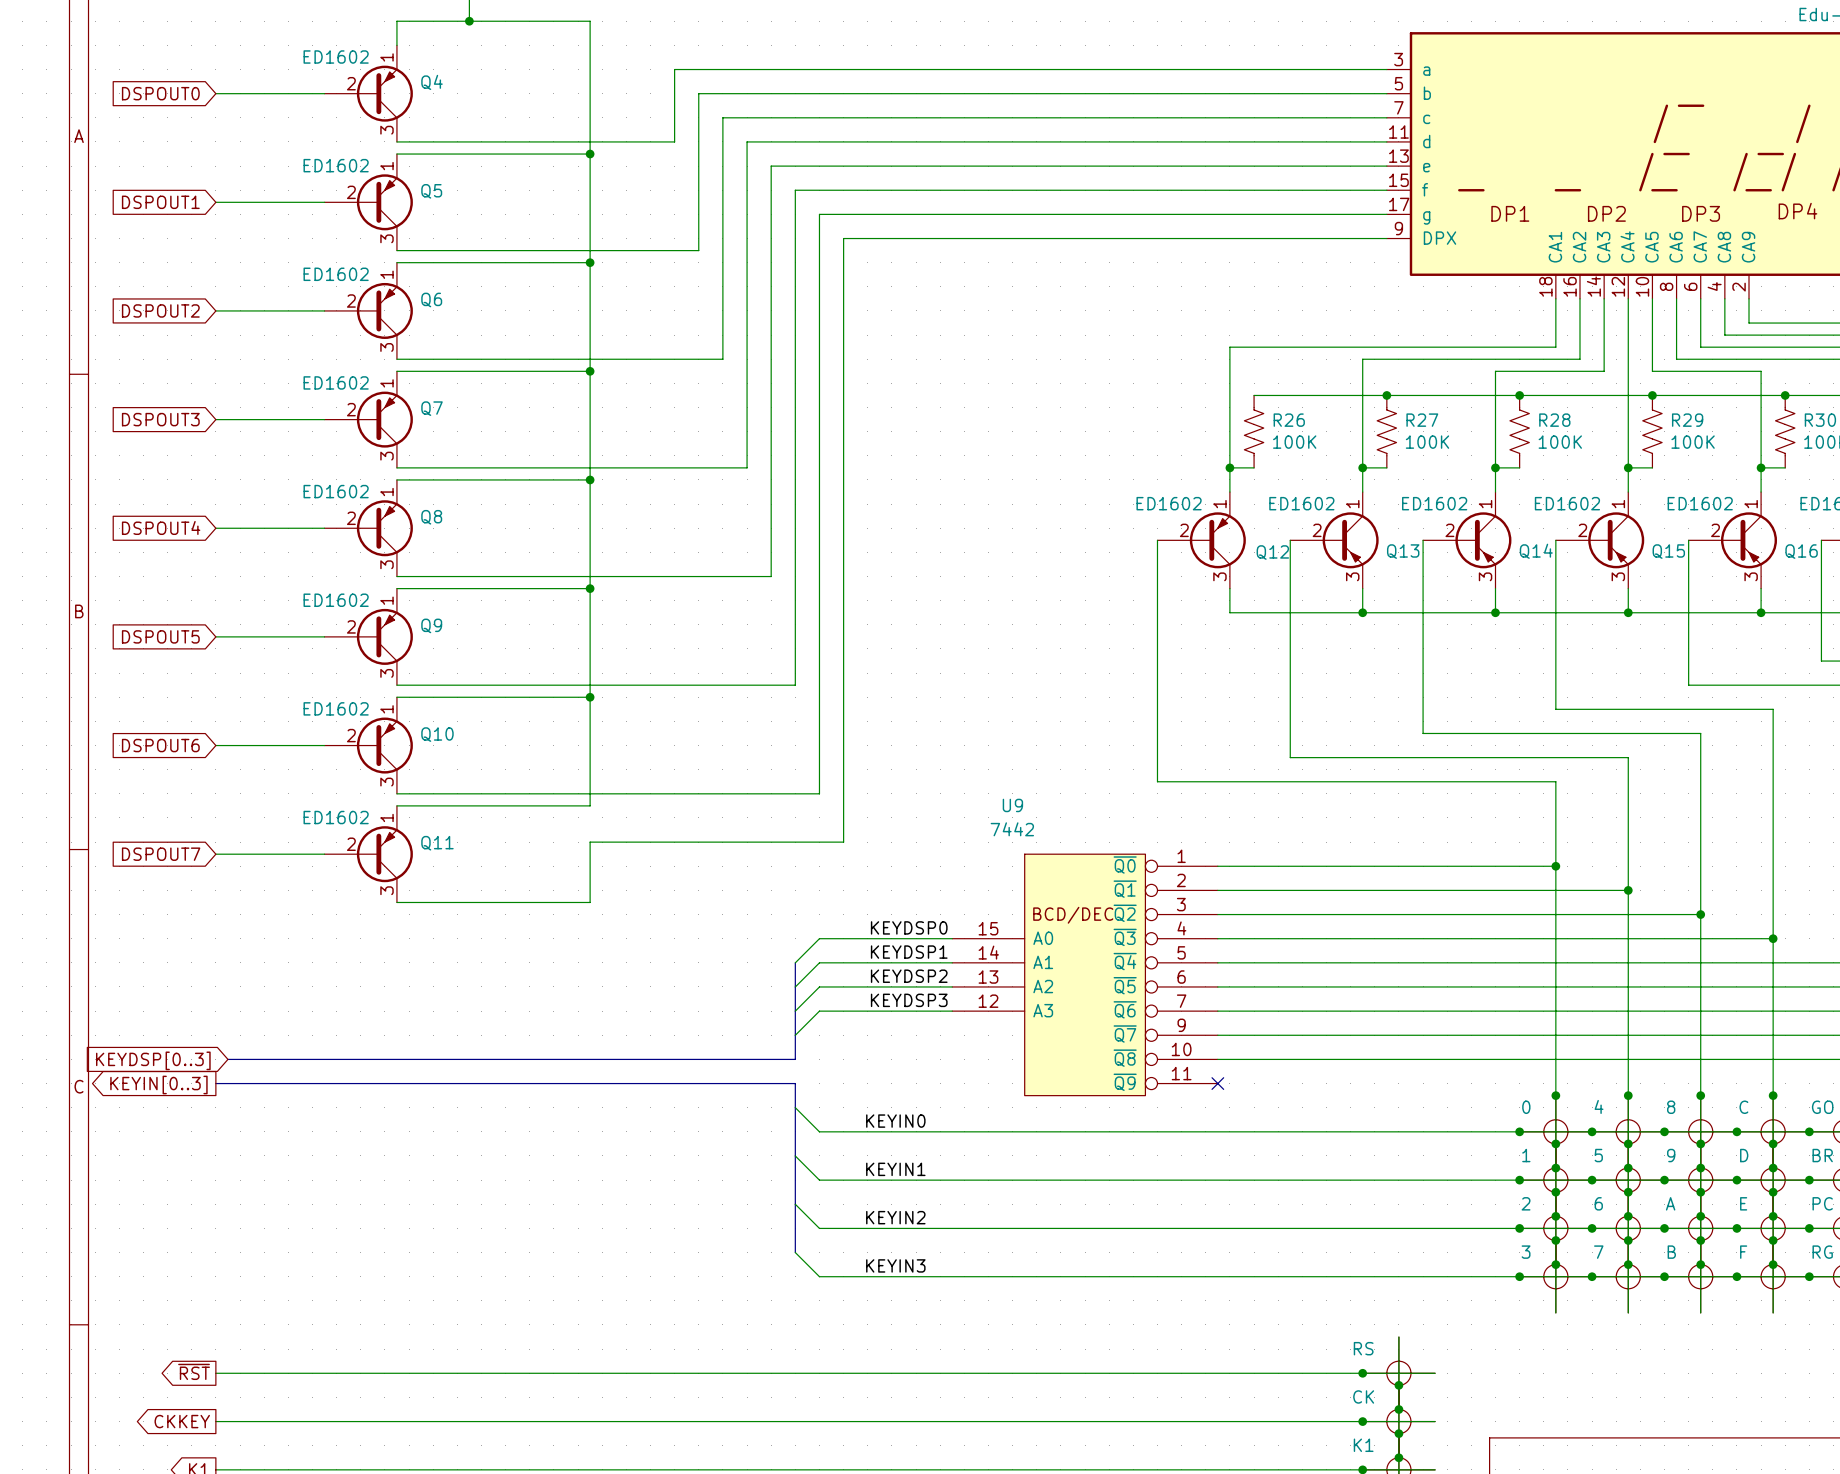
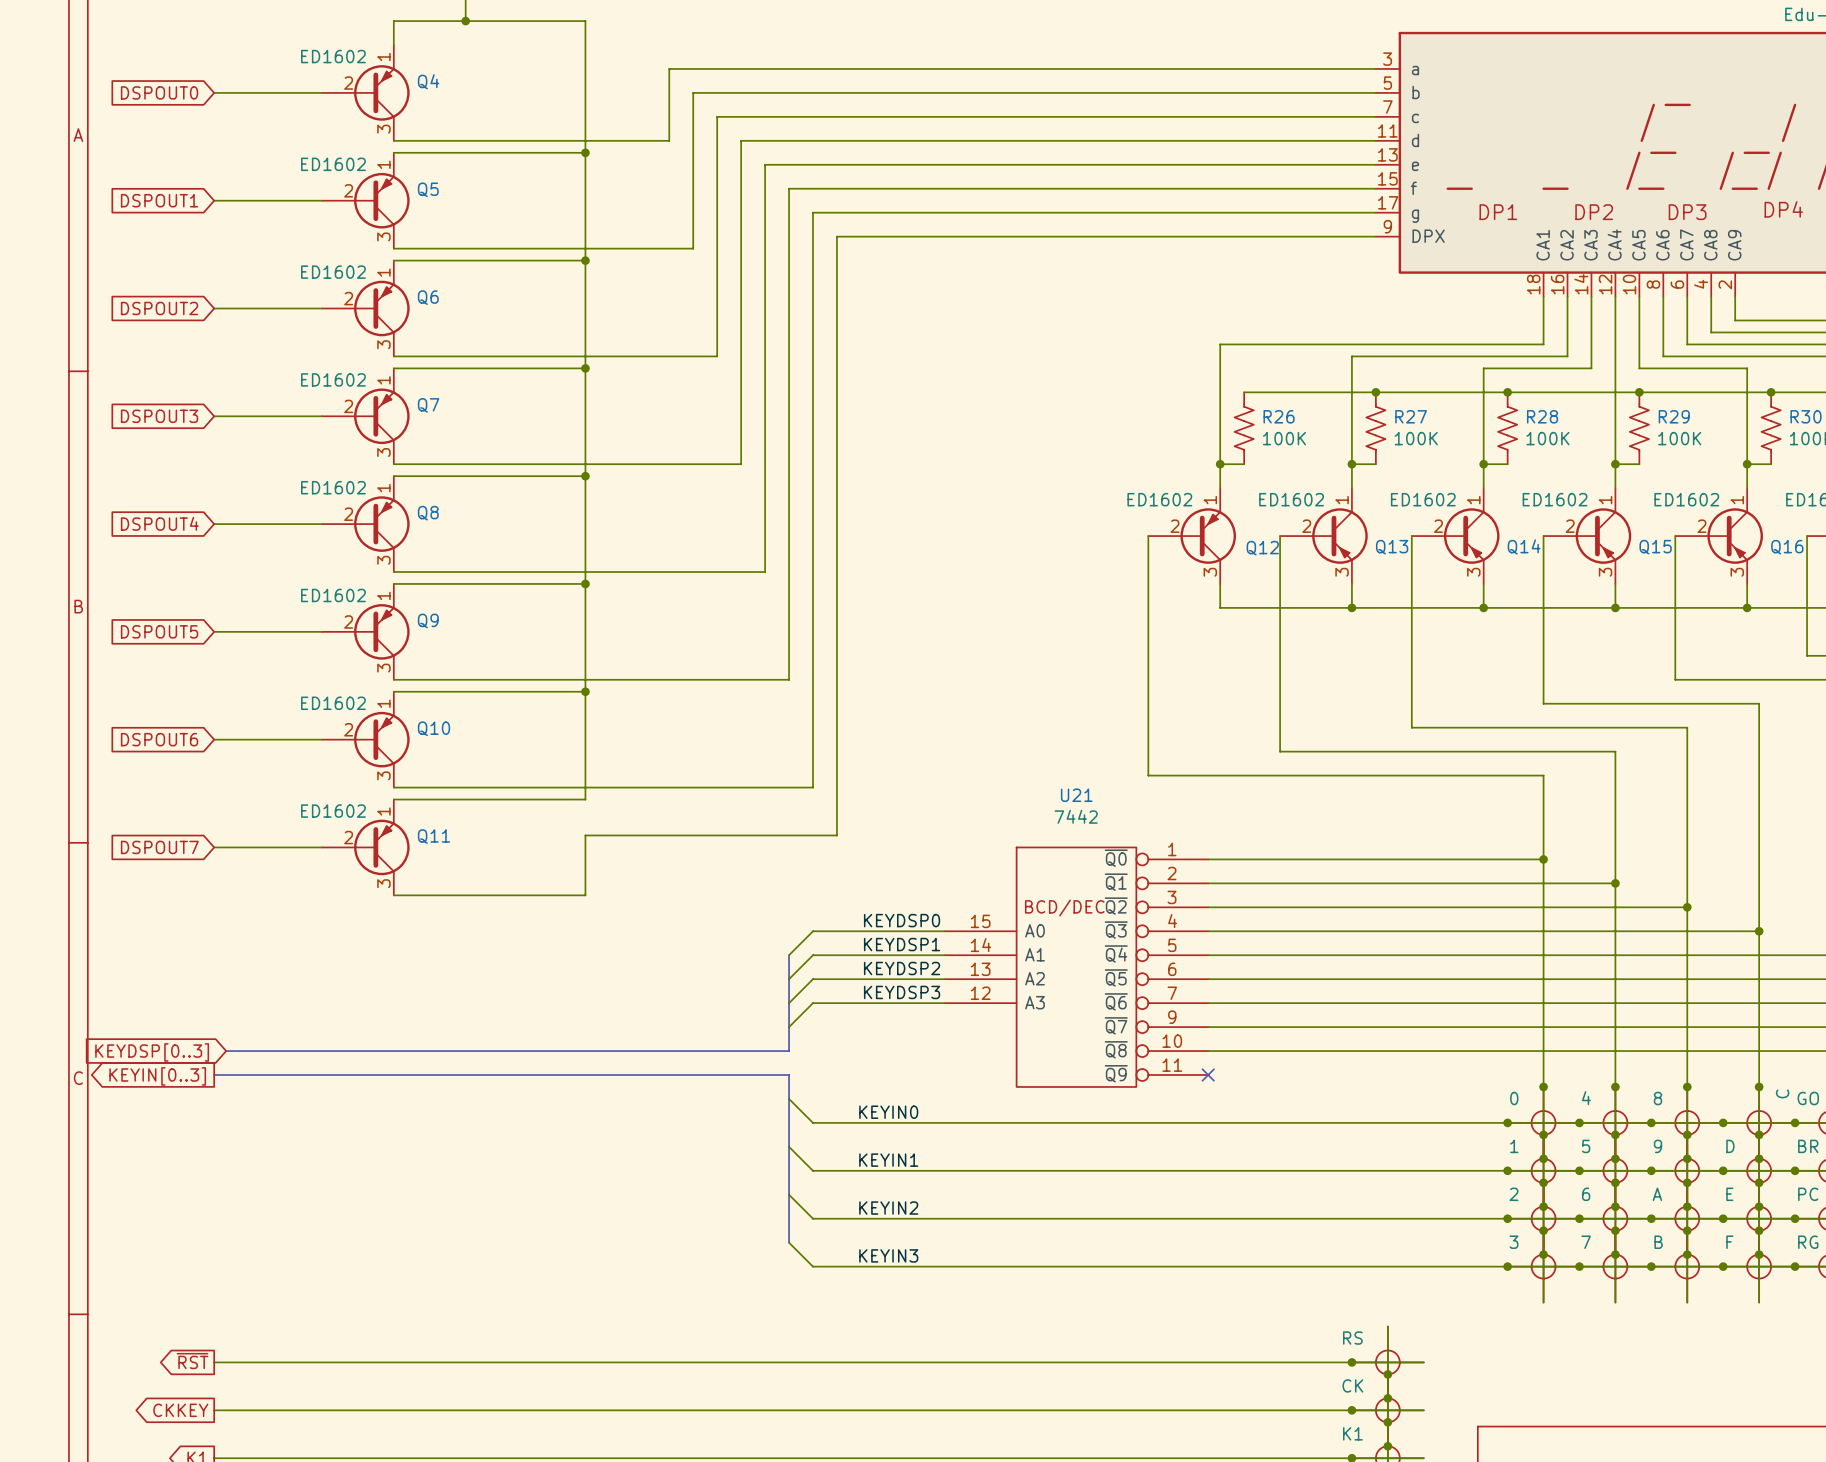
U9: 7442 (1085, 974) -> none
U21: none -> 7442 (1076, 967)
part value rotation: 0° (1743, 1107) -> 90° counterclockwise (1782, 1093)
part value position: C (1743, 1107) -> C (1782, 1093)

